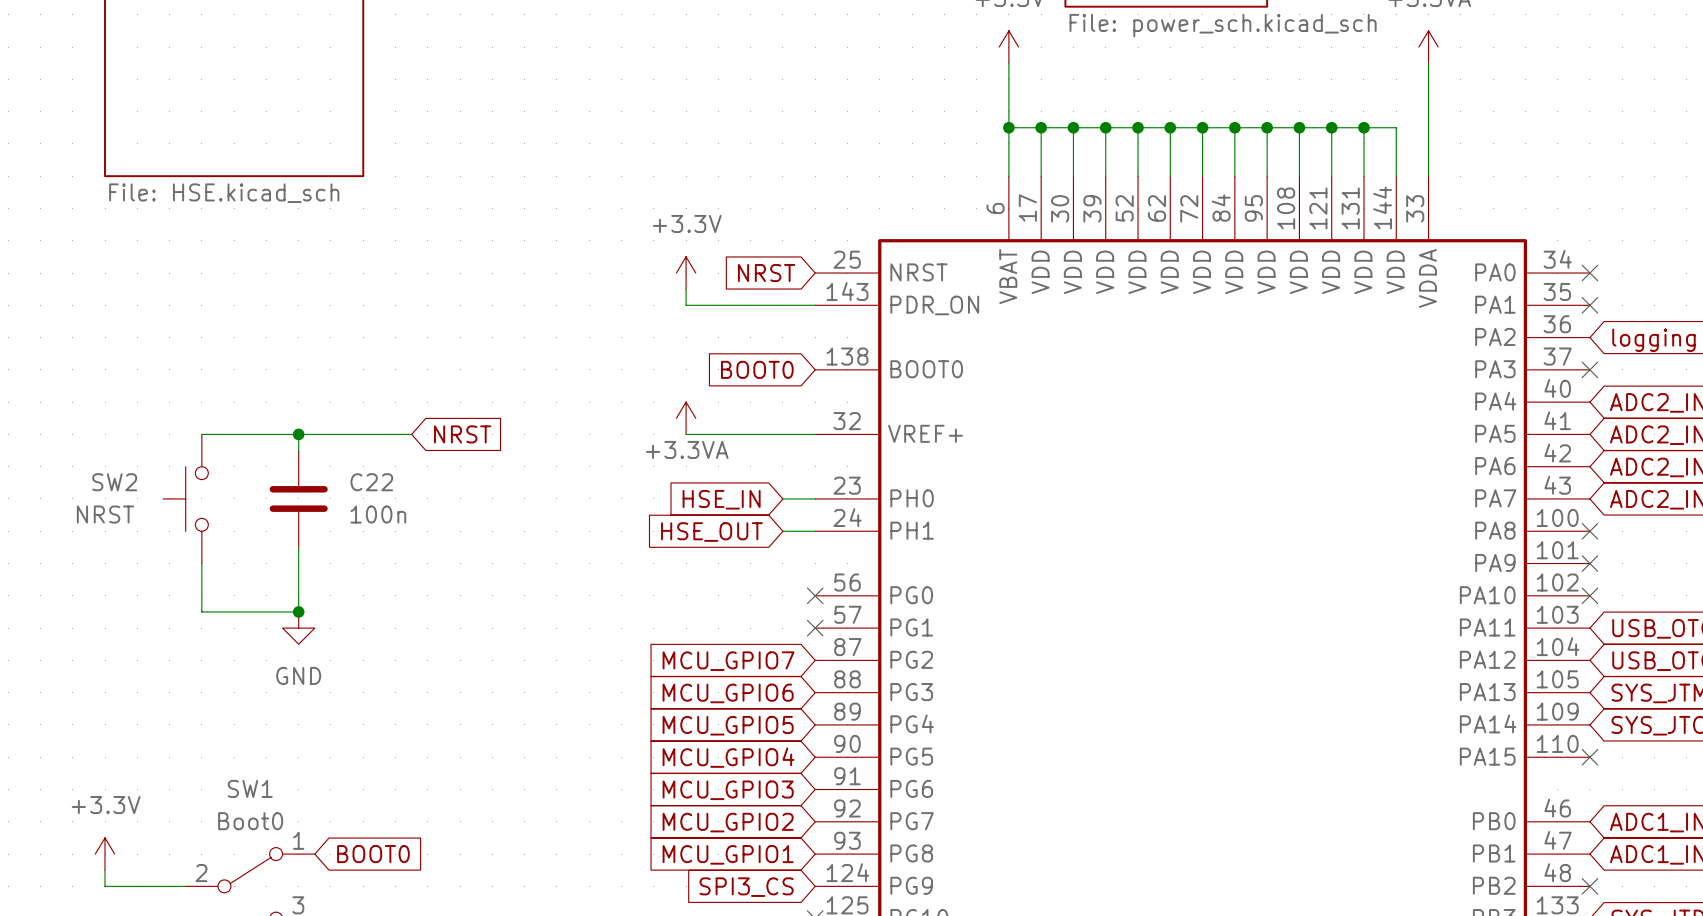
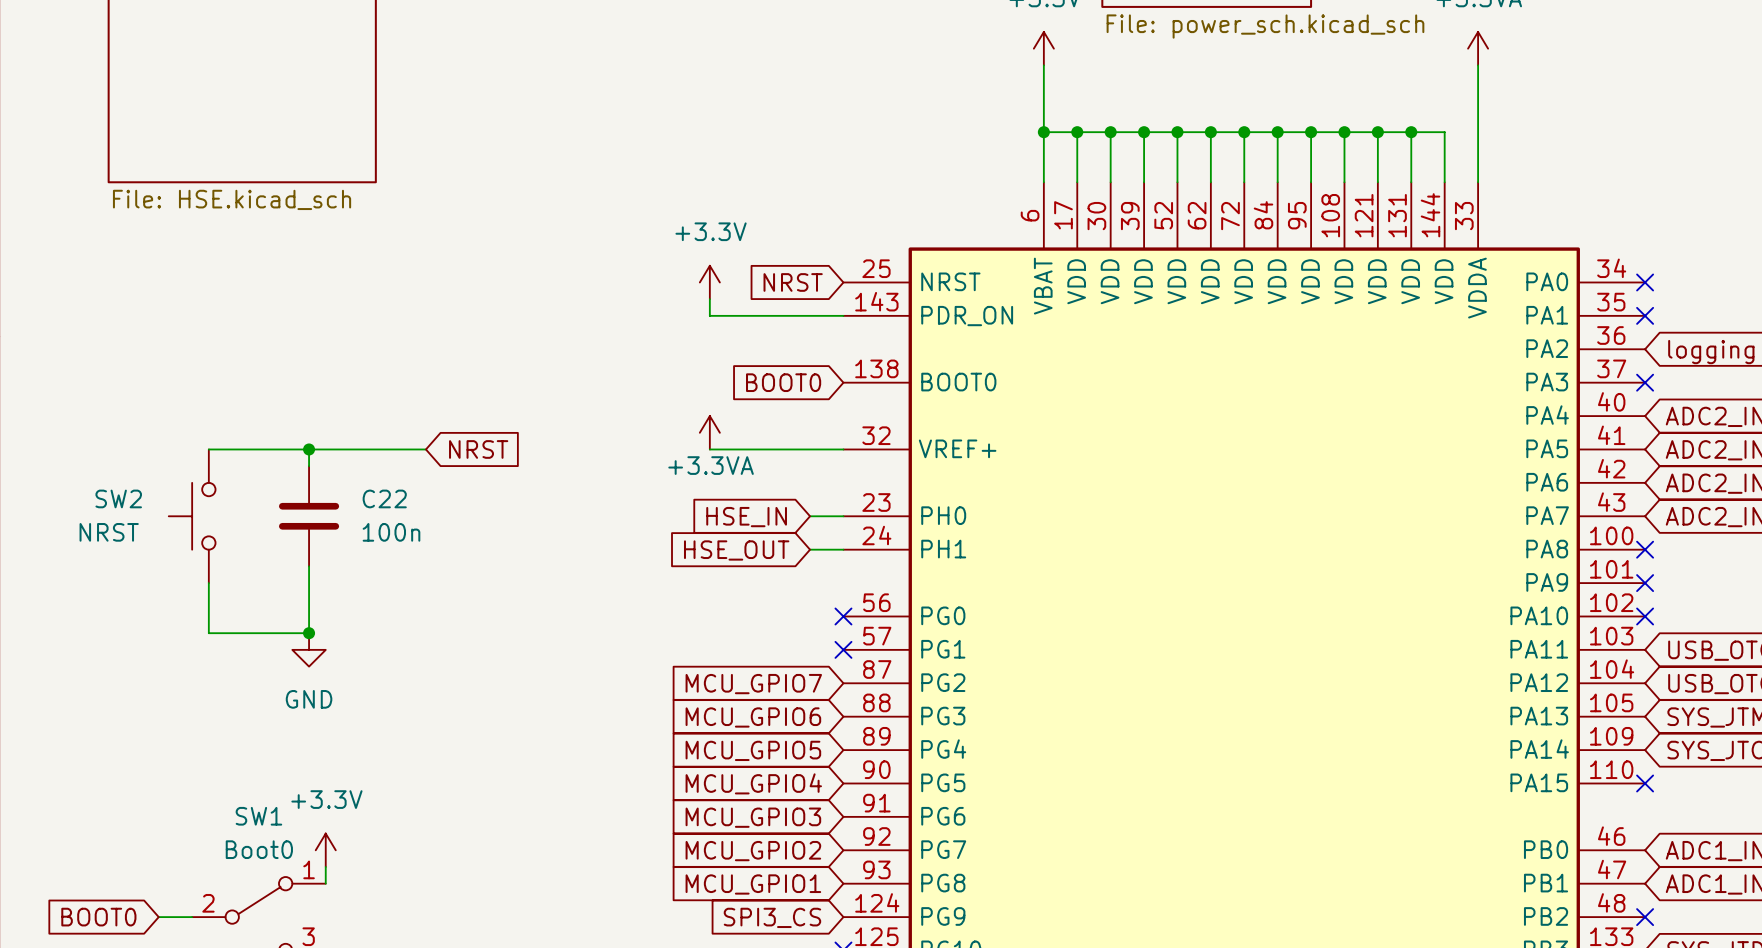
wire: none -> (325, 866) (325, 883)
power symbol position: +3.3V (105, 854) -> +3.3V (325, 850)
global label rotation: 0° (373, 854) -> 180° (98, 917)
global label position: BOOT0 (373, 854) -> BOOT0 (98, 917)
wire: (105, 870) (105, 886) (153, 886) -> none

